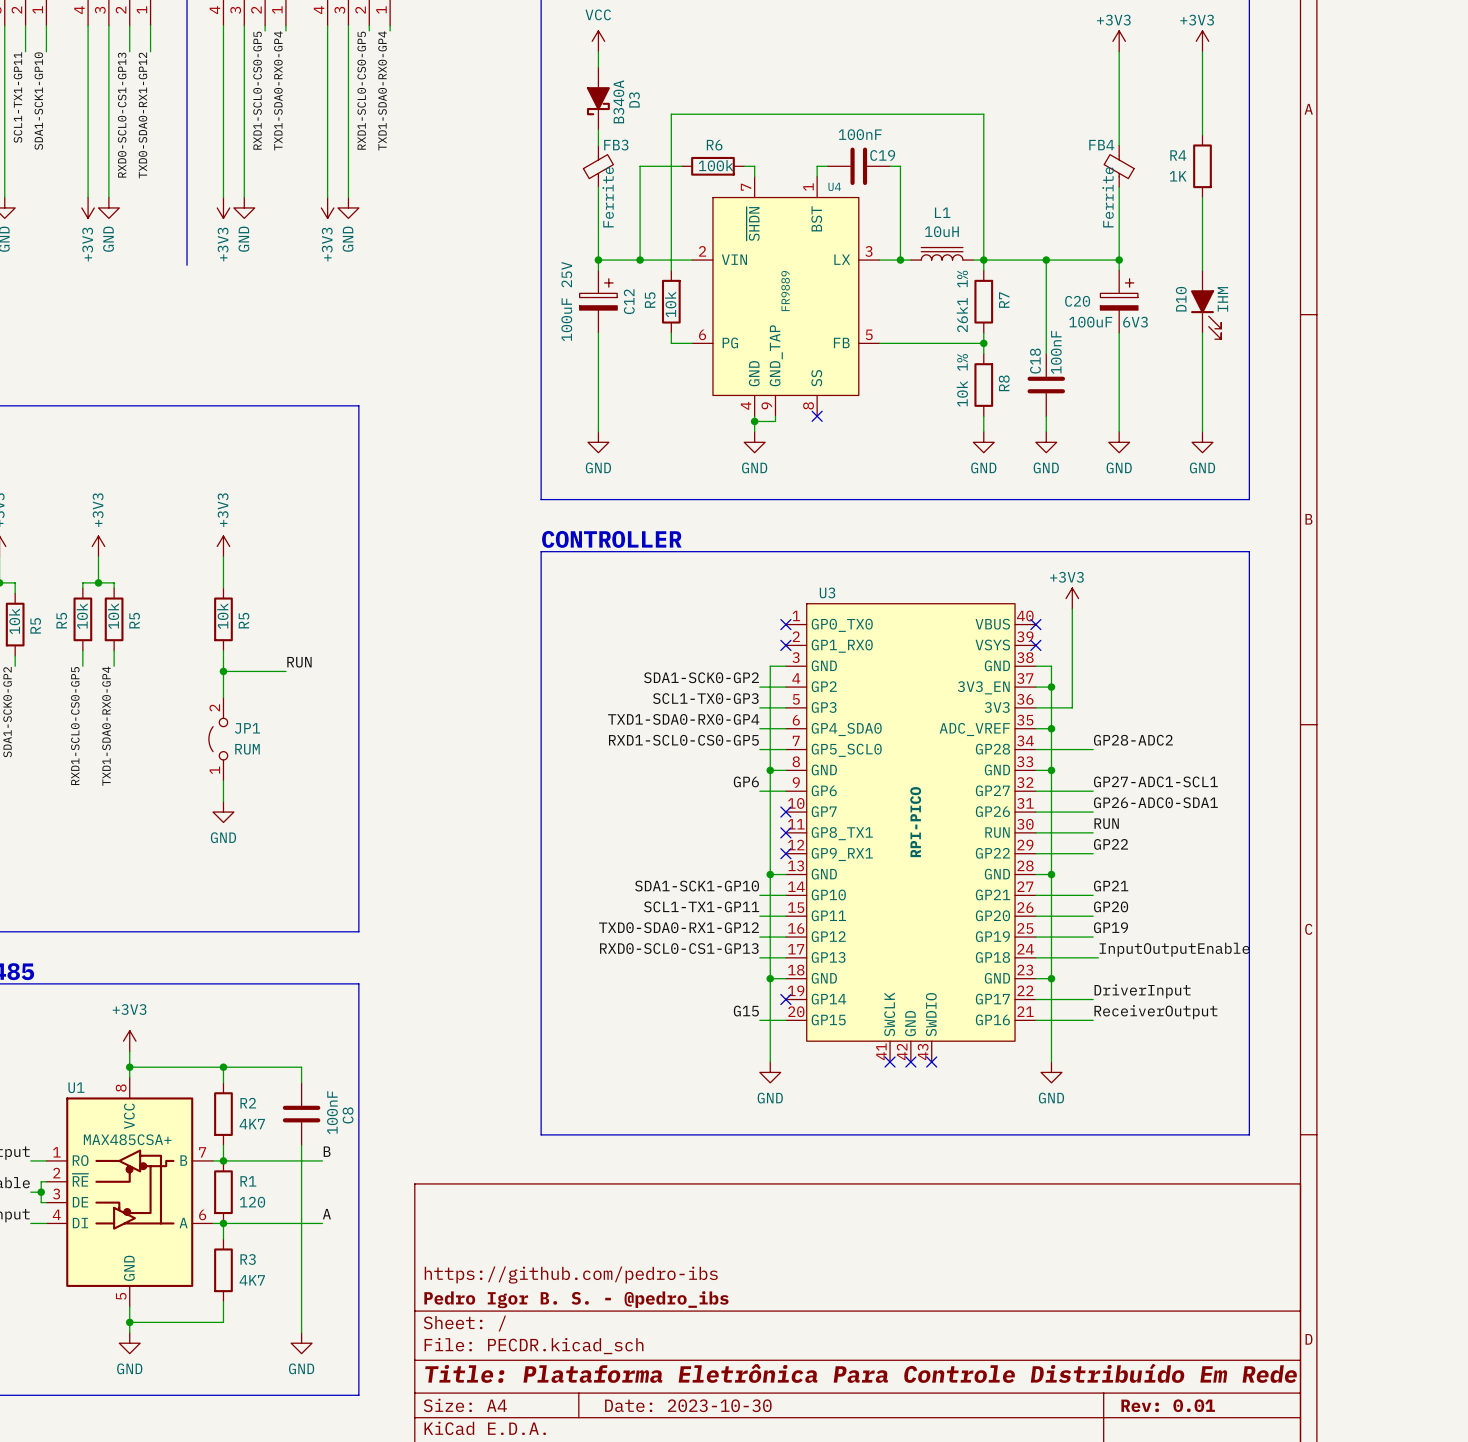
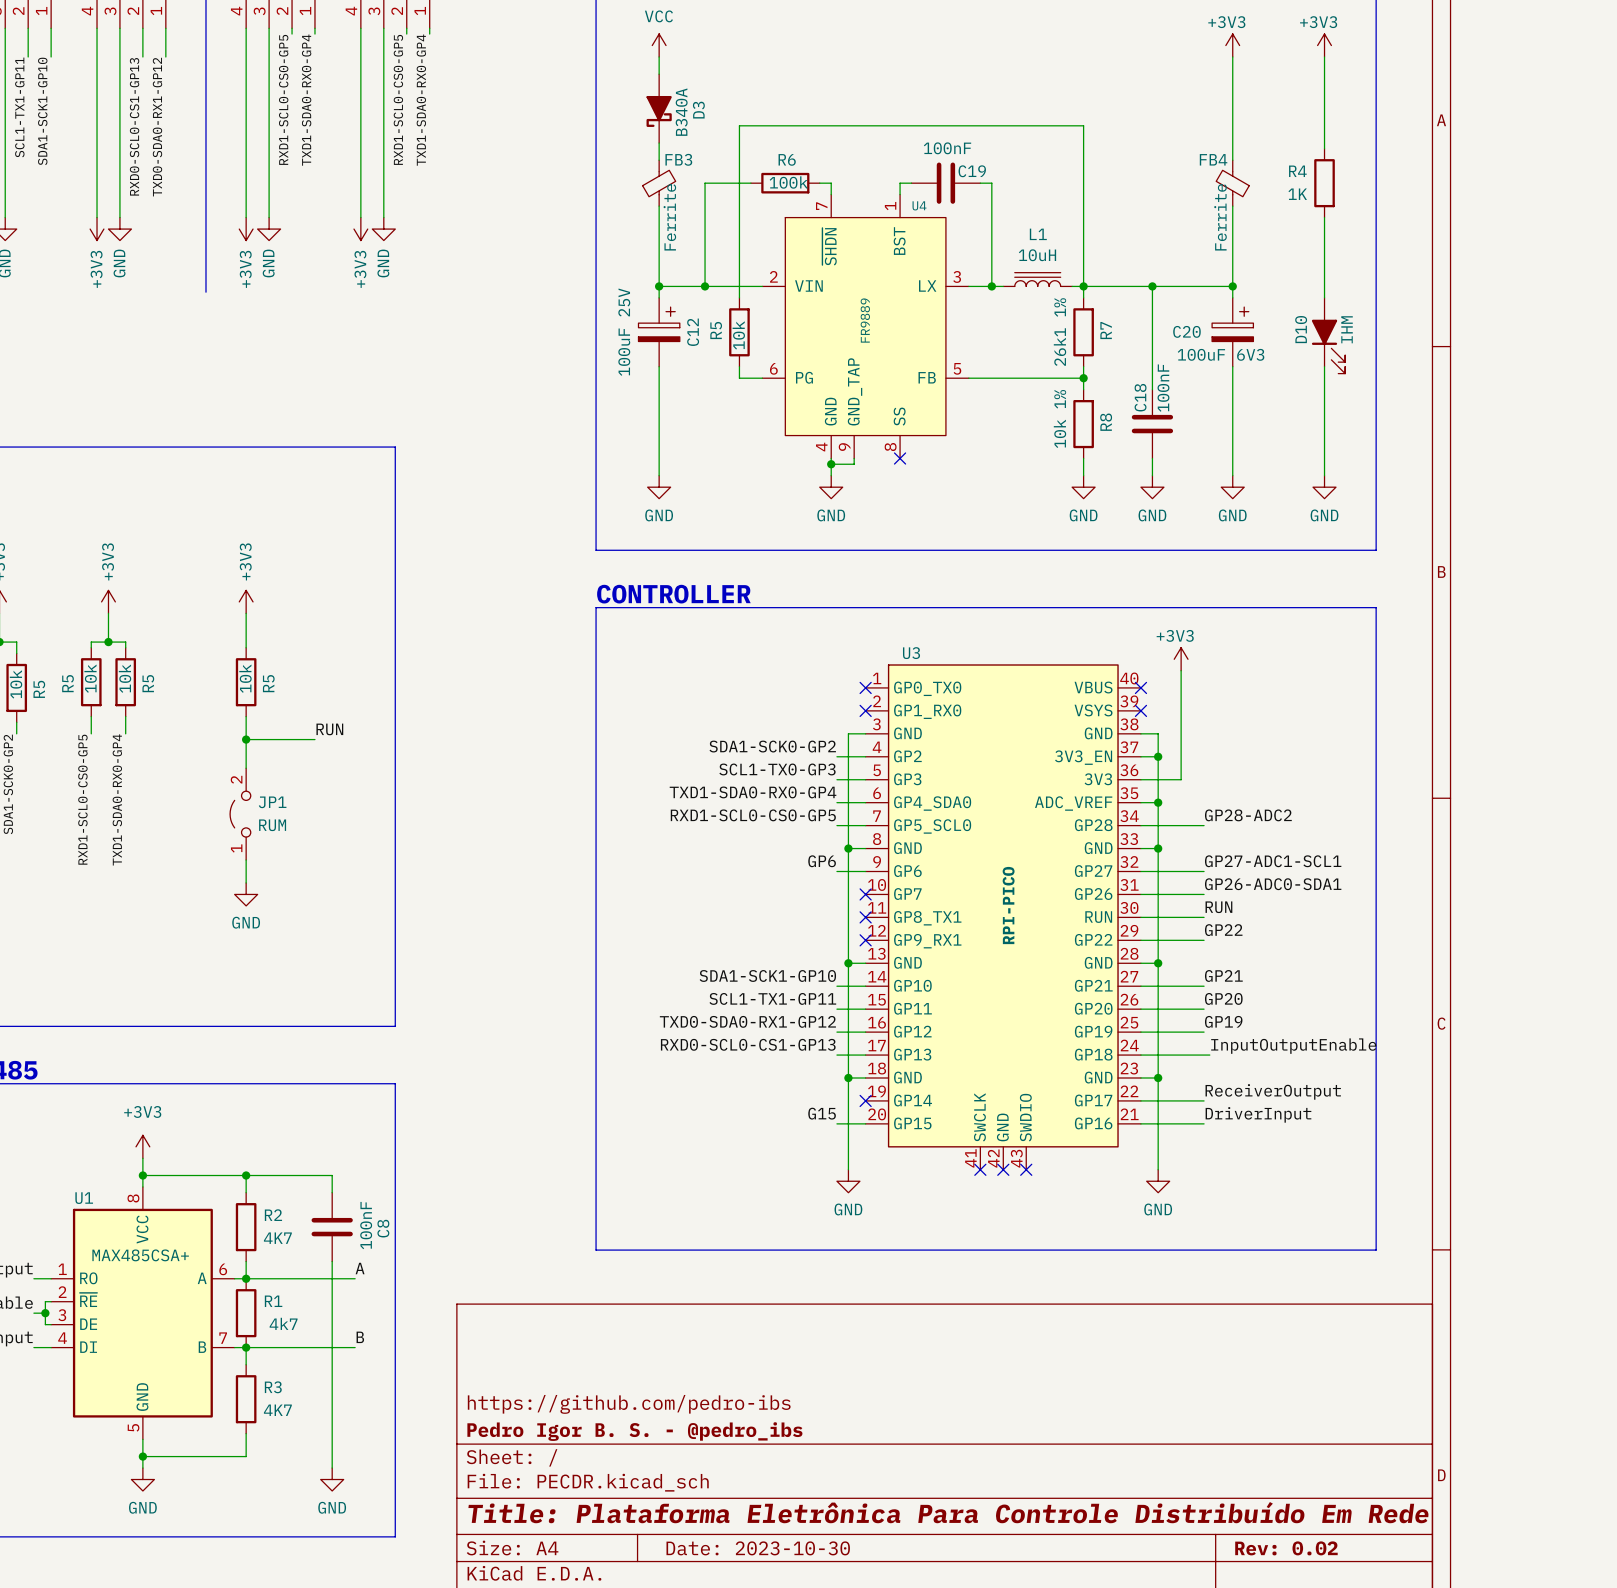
label: DriverInput (1142, 991) -> ReceiverOutput (1273, 1091)
label: ReceiverOutput (1155, 1012) -> DriverInput (1258, 1114)
U1 symbol: [46, 1077, 214, 1307] -> [51, 1186, 235, 1440]
label: B (327, 1151) -> A (360, 1268)
R1 value: 120 (252, 1202) -> 4k7 (283, 1323)
label: A (326, 1214) -> B (360, 1337)
title block: Rev: 0.01 (1168, 1405) -> Rev: 0.02 (1286, 1548)

